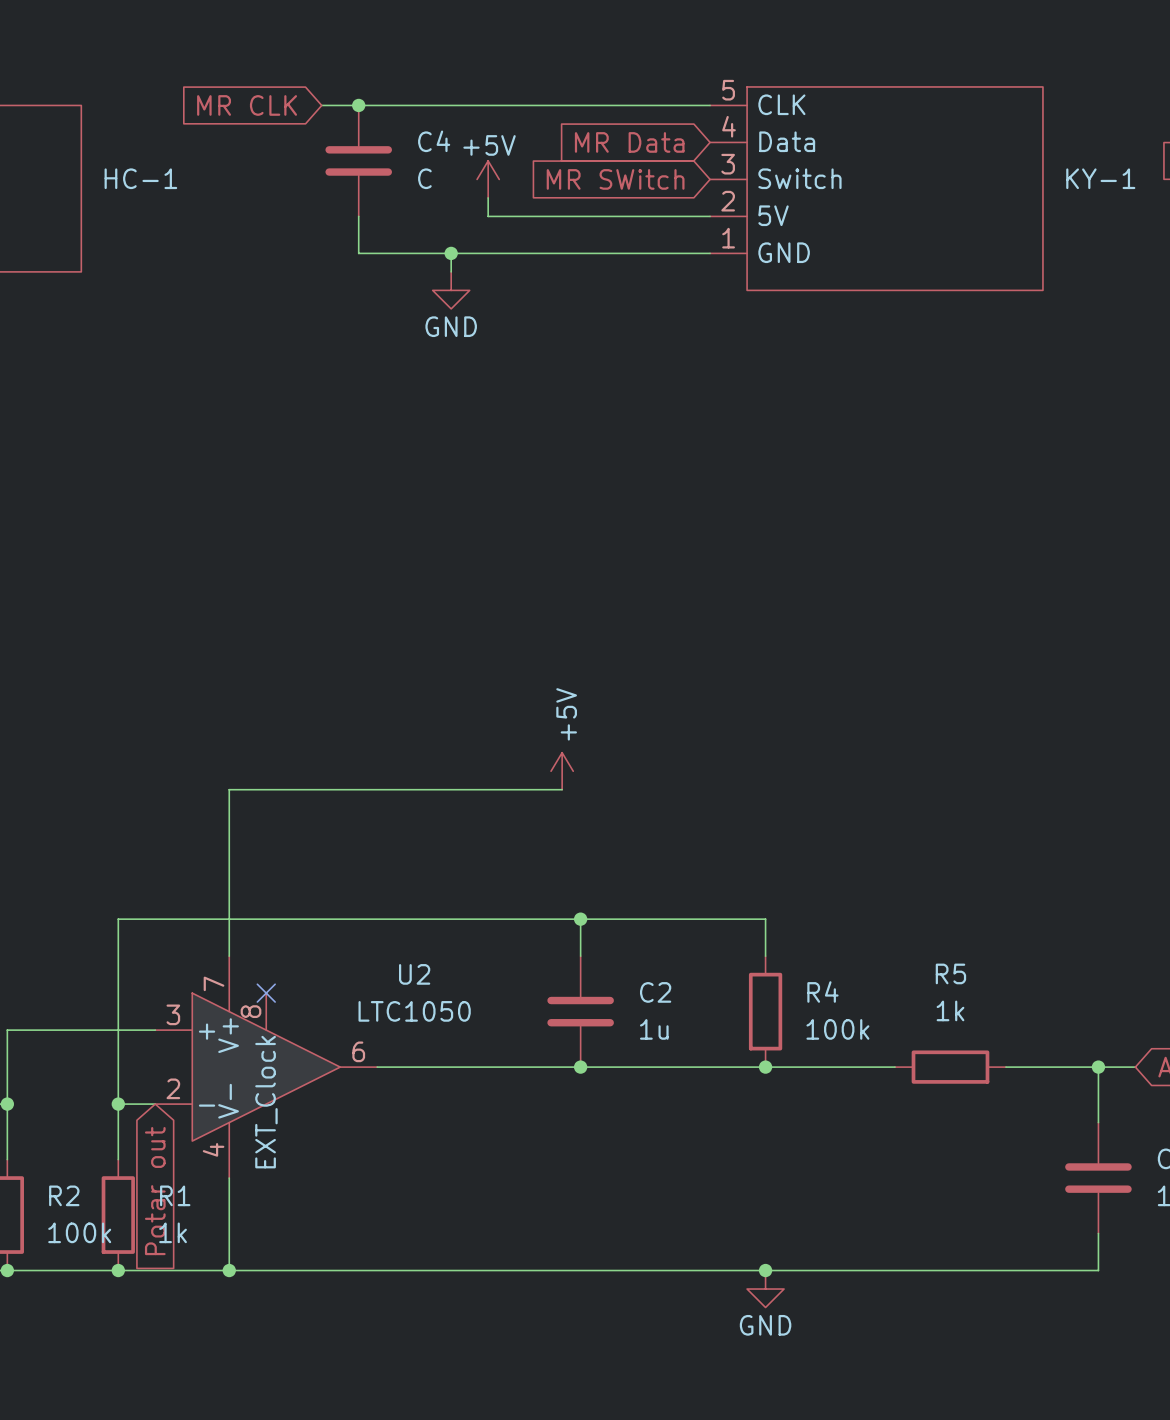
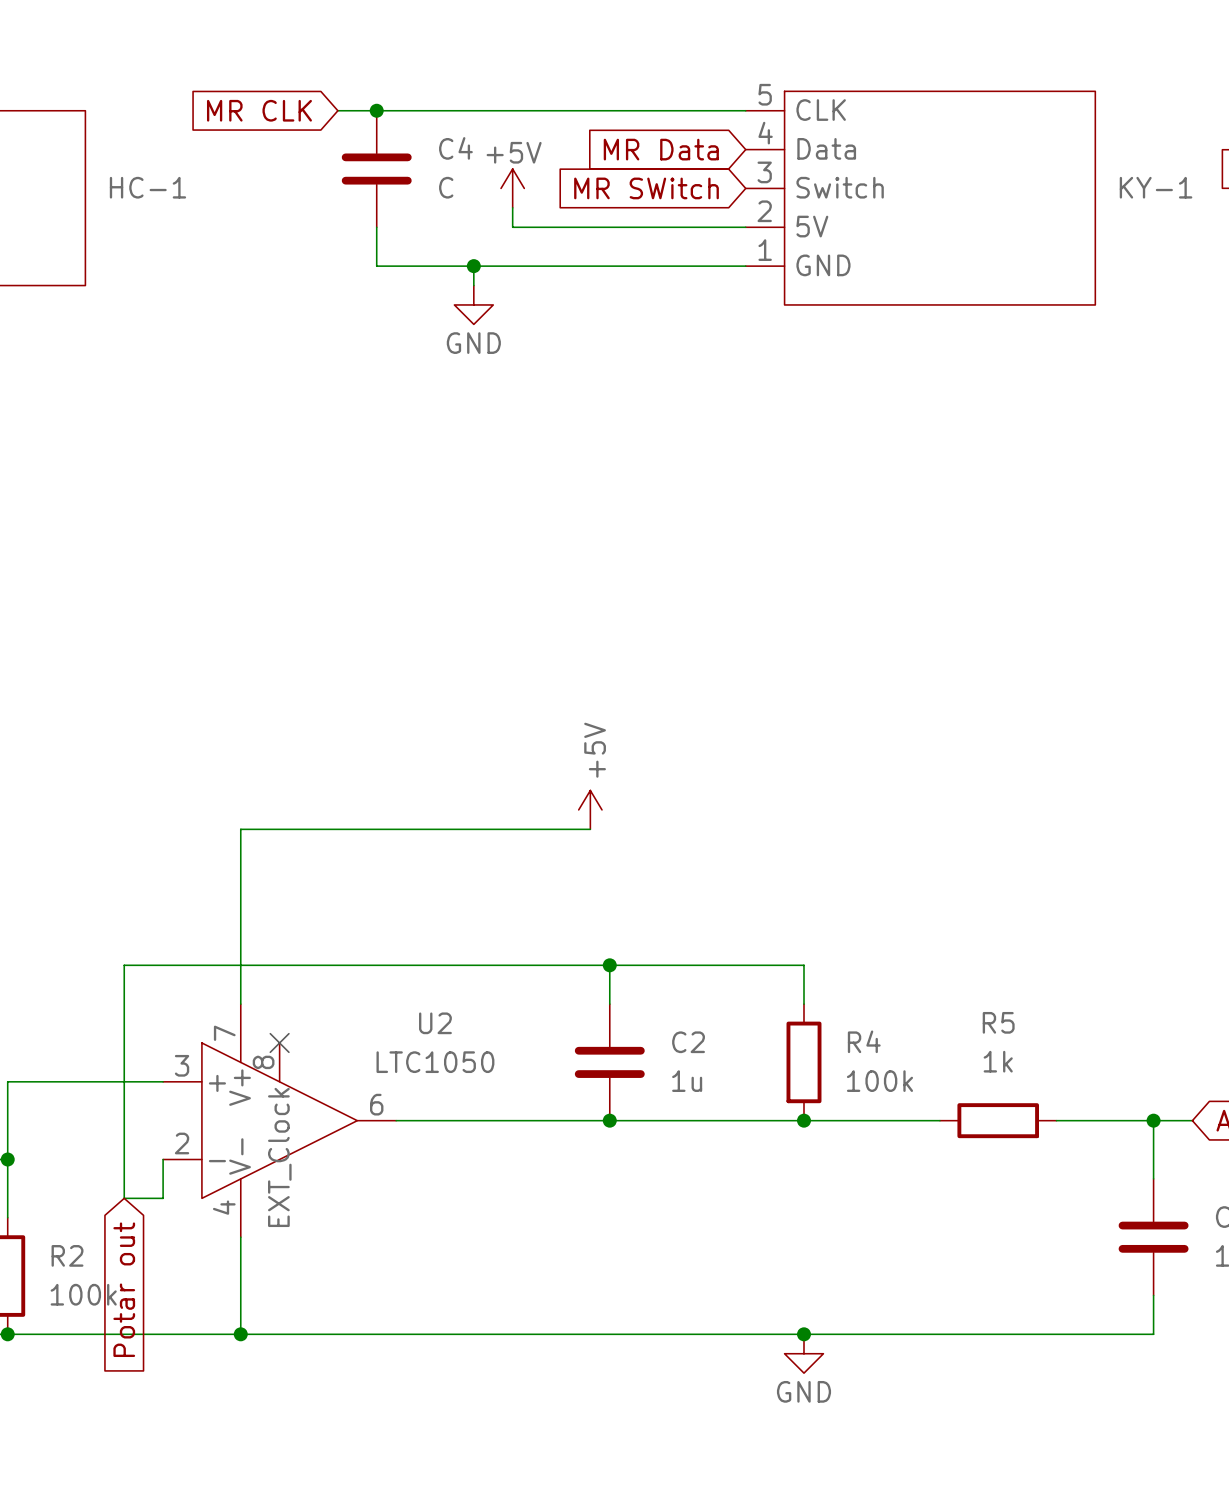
wire: (118, 1104) (155, 1104) -> (124, 1198) (163, 1198) (163, 1159)
junction: (118, 1104) -> none
wire: (118, 1141) (118, 1159) -> none
global label position: Potar out (155, 1191) -> Potar out (124, 1289)
R1: 1k (118, 1215) -> none
junction: (118, 1270) -> none

